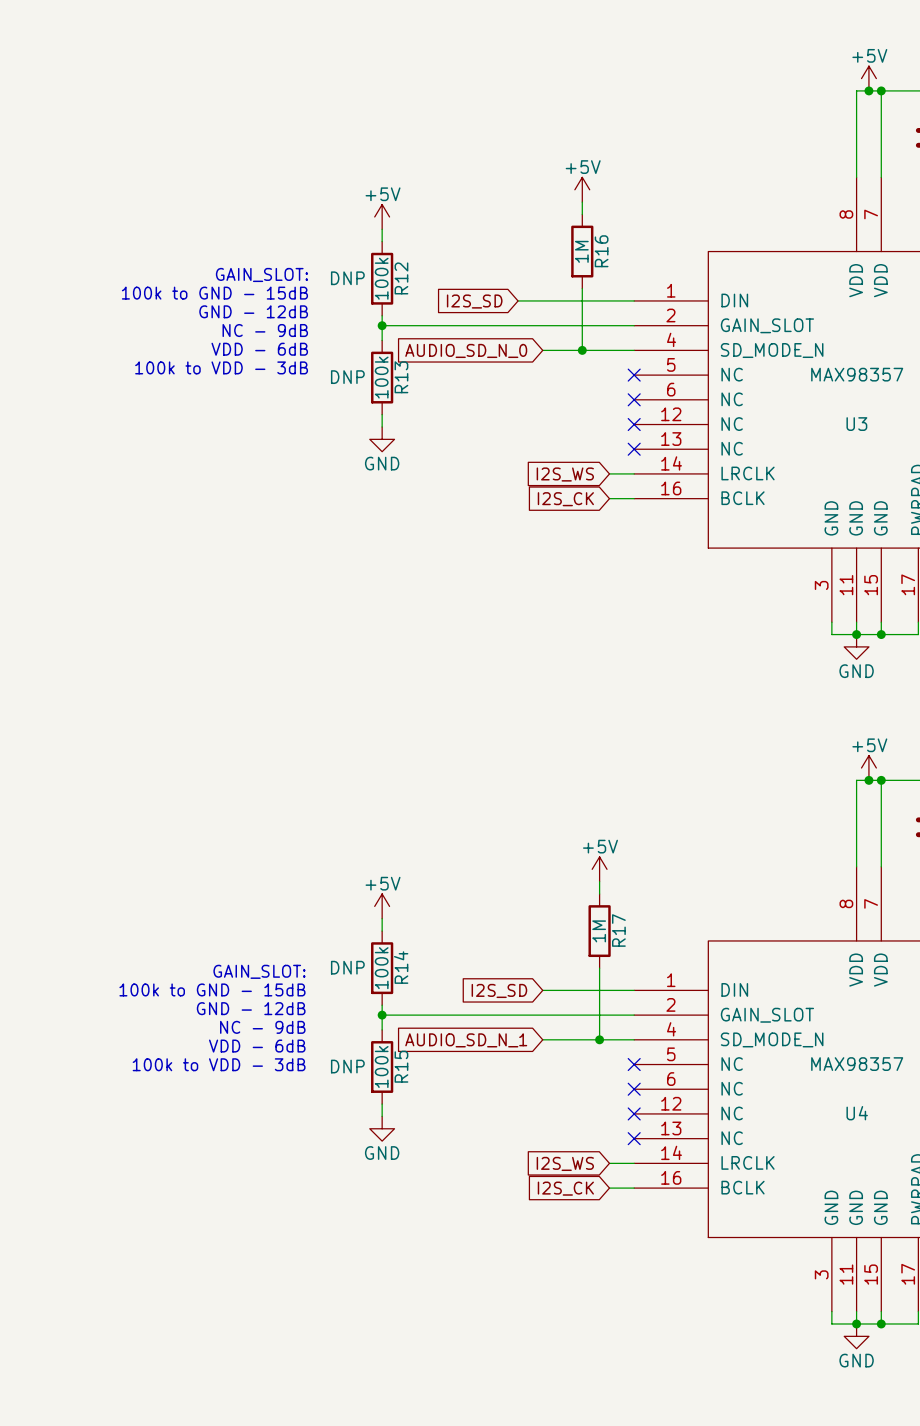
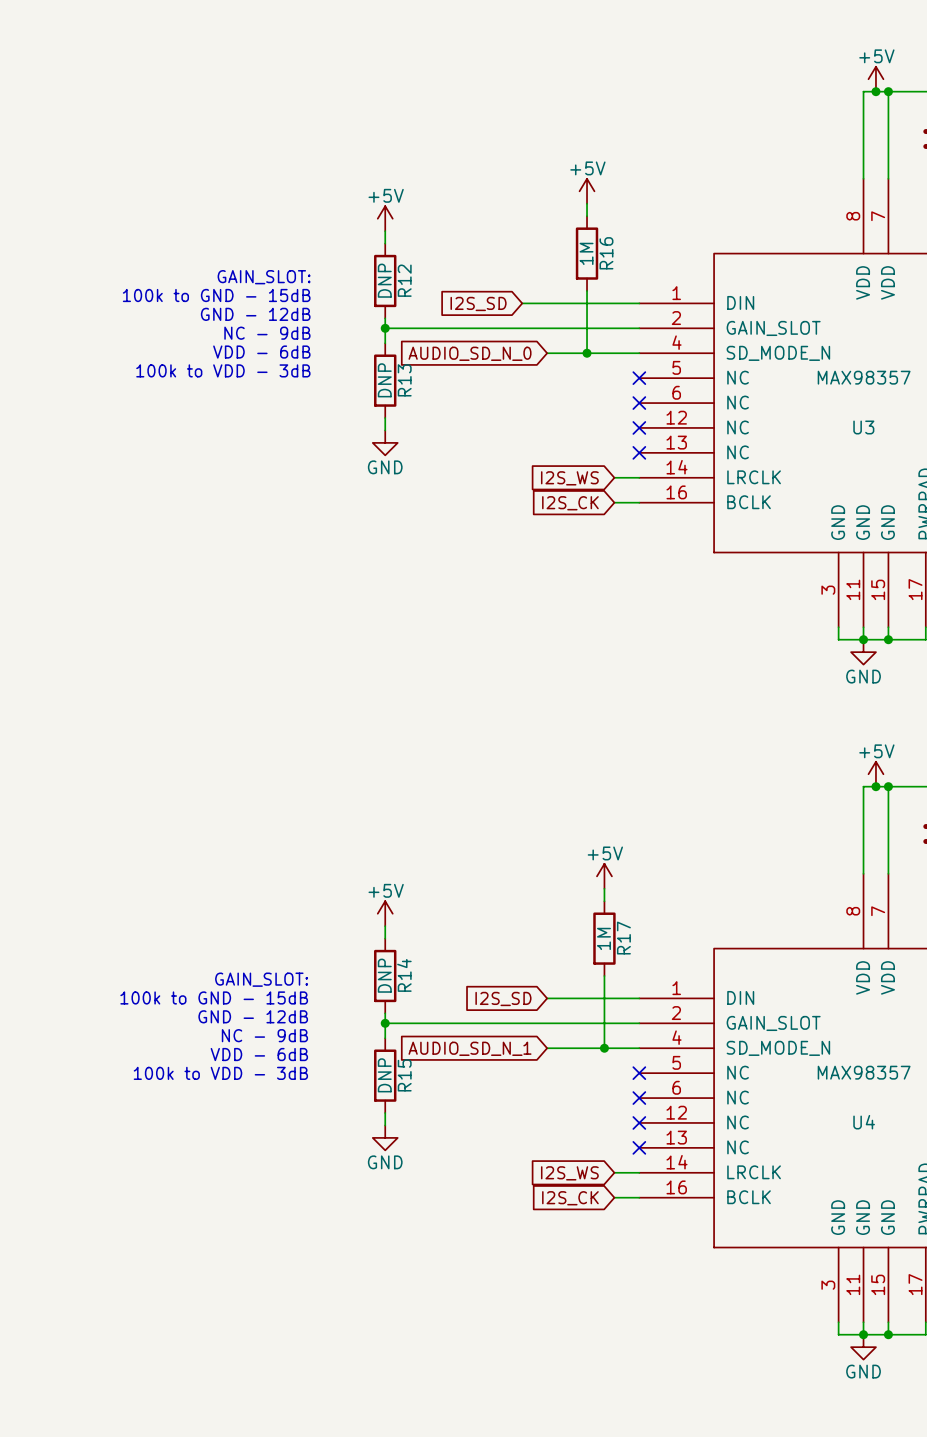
R12 text: DNP (347, 278) -> none
R12 value: 100k (381, 278) -> DNP (384, 280)
R13 text: DNP (347, 377) -> none
R13 value: 100k (381, 377) -> DNP (384, 380)
R14 text: DNP (347, 967) -> none
R14 value: 100k (381, 968) -> DNP (384, 975)
R15 text: DNP (347, 1066) -> none
R15 value: 100k (381, 1067) -> DNP (384, 1075)

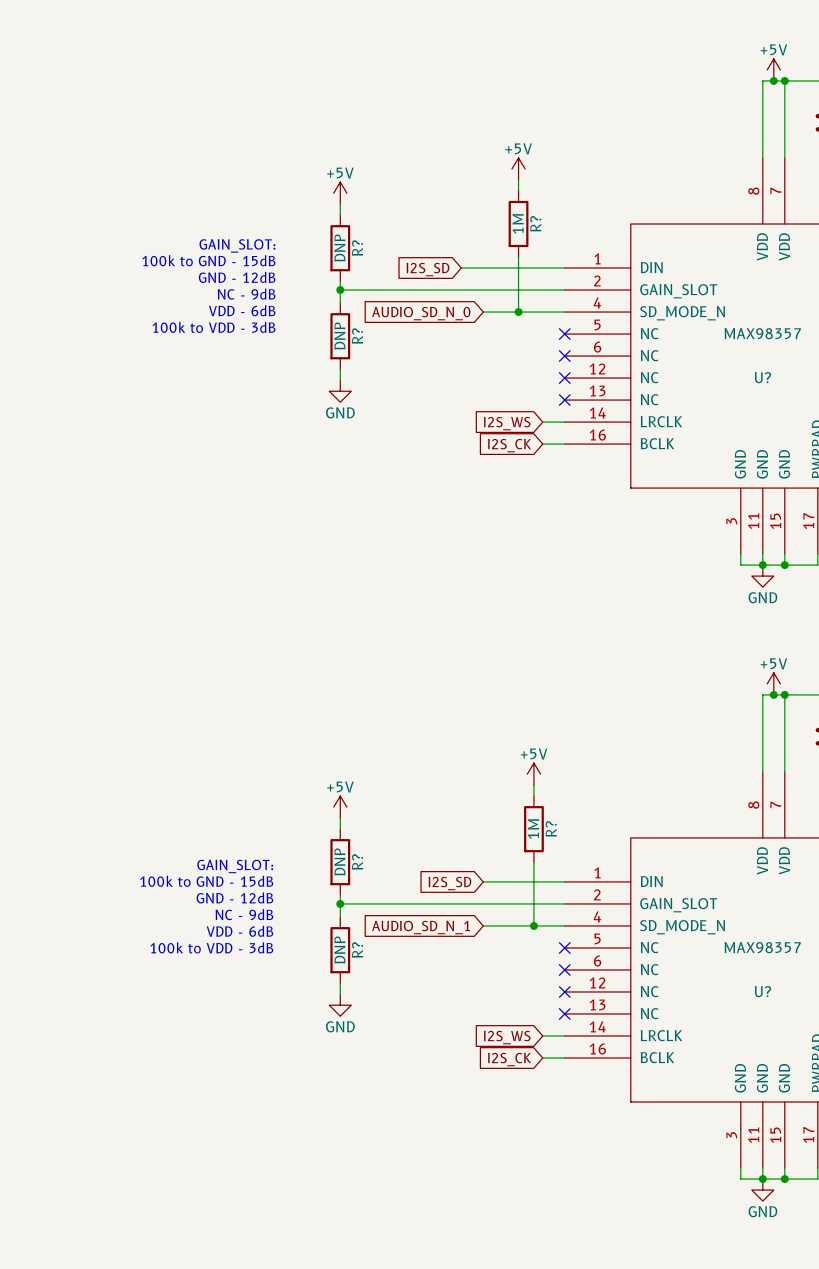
R16 name: R16 (606, 253) -> R? (535, 223)
R12 name: R12 (404, 280) -> R? (357, 248)
R13 name: R13 (404, 380) -> R? (357, 336)
U3 name: U3 (863, 427) -> U? (762, 377)
R17 name: R17 (623, 938) -> R? (551, 828)
R14 name: R14 (404, 975) -> R? (357, 861)
R15 name: R15 (404, 1075) -> R? (357, 949)
U4 name: U4 (864, 1122) -> U? (762, 991)

